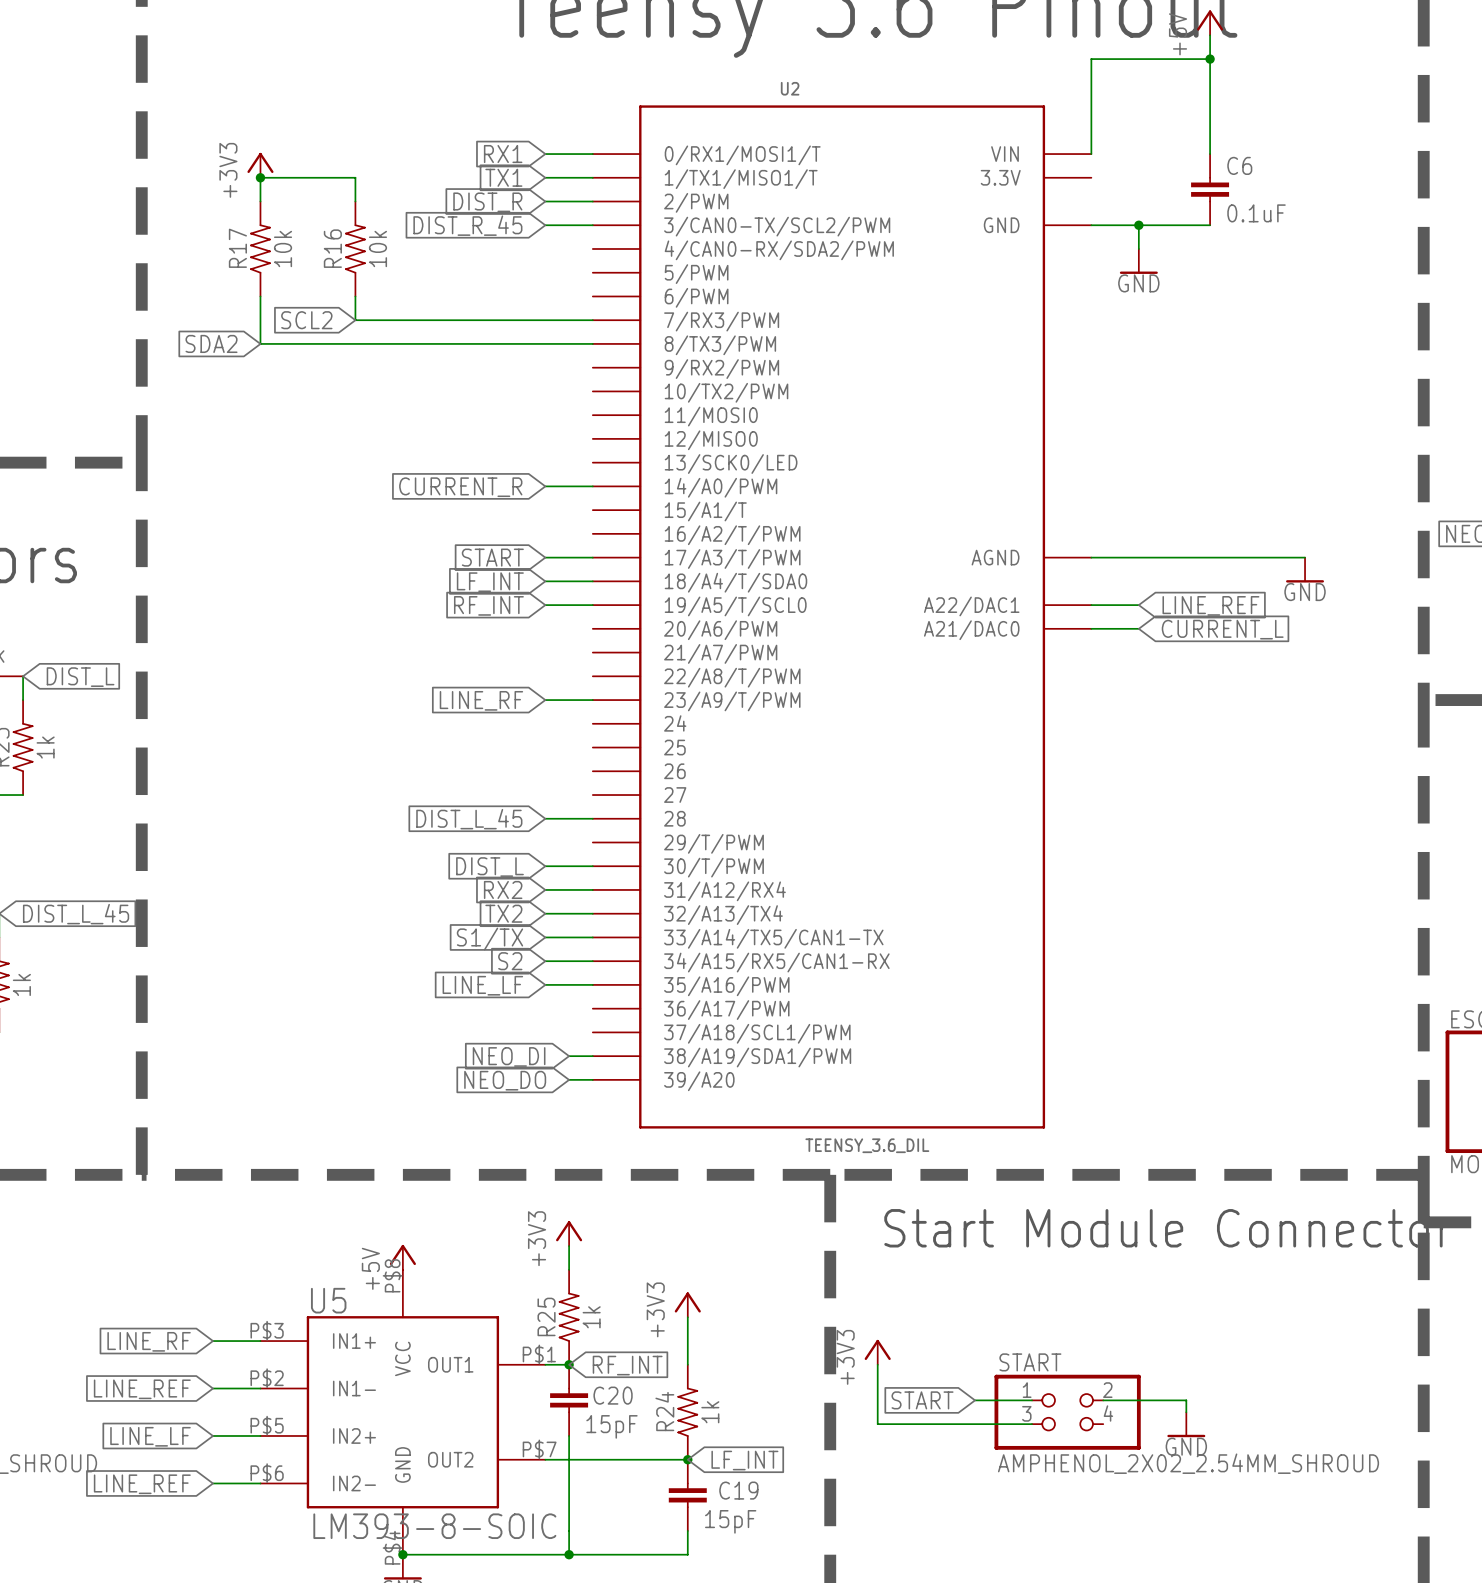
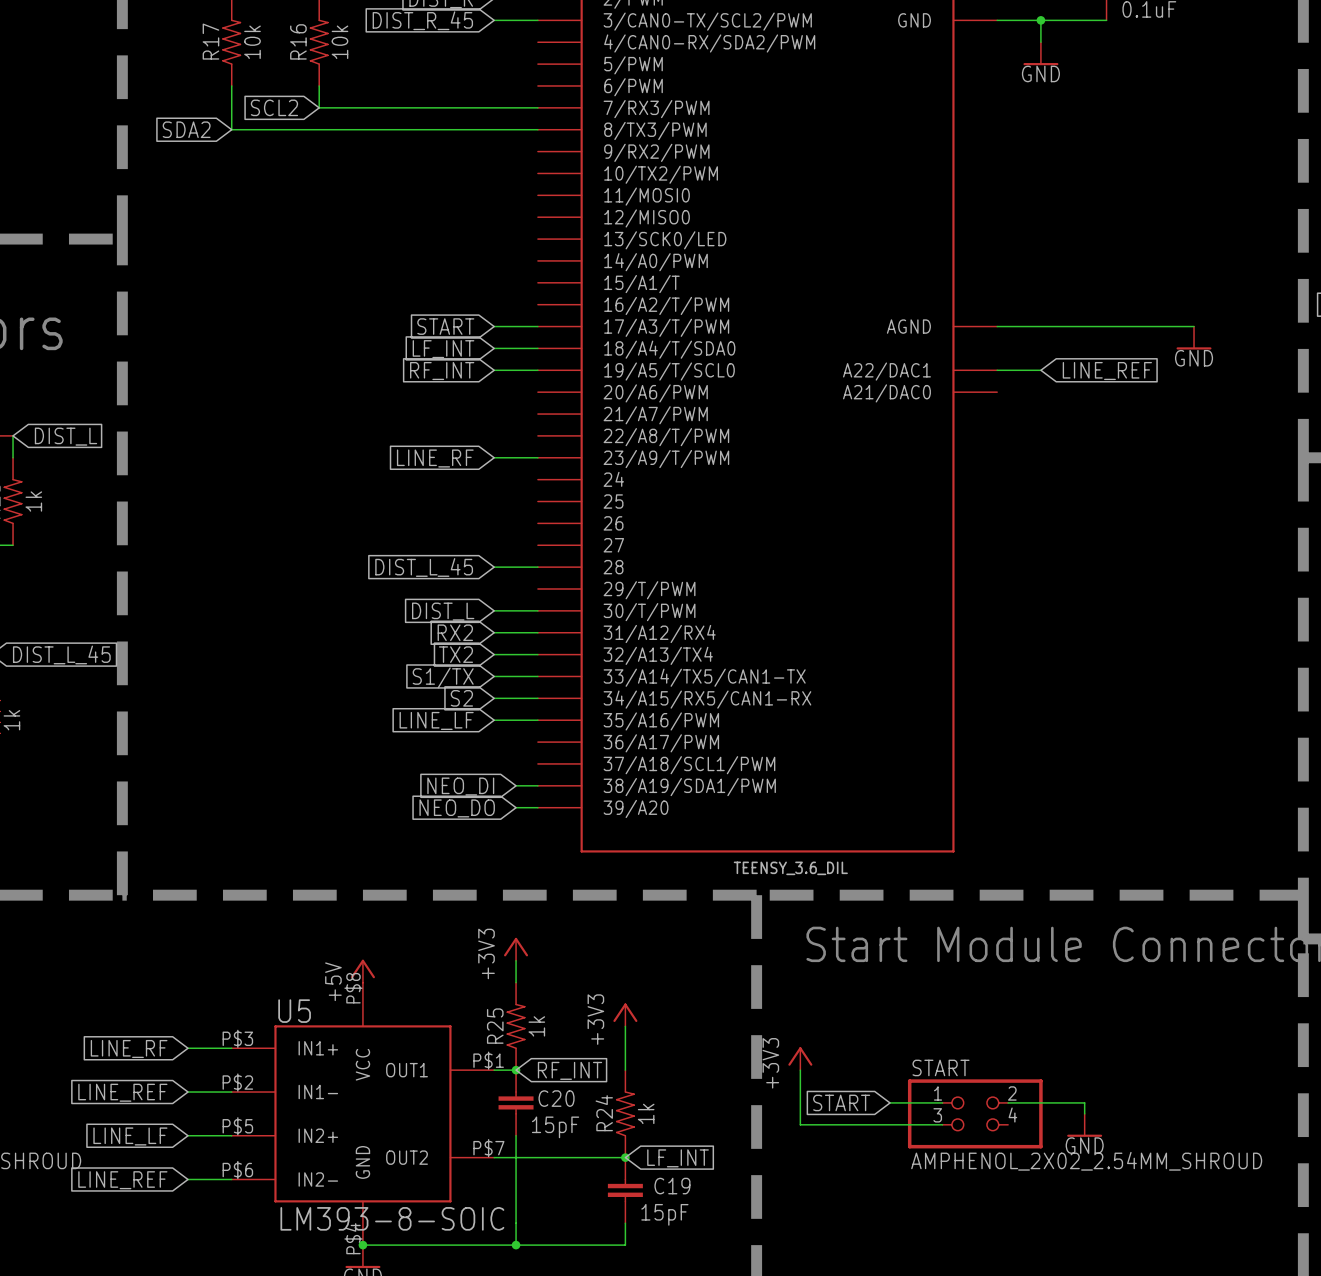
wire: (545, 486) (592, 486) -> none
global label: CURRENT_R (460, 487) -> none
wire: (1091, 628) (1138, 628) -> none
global label: CURRENT_L (1222, 629) -> none

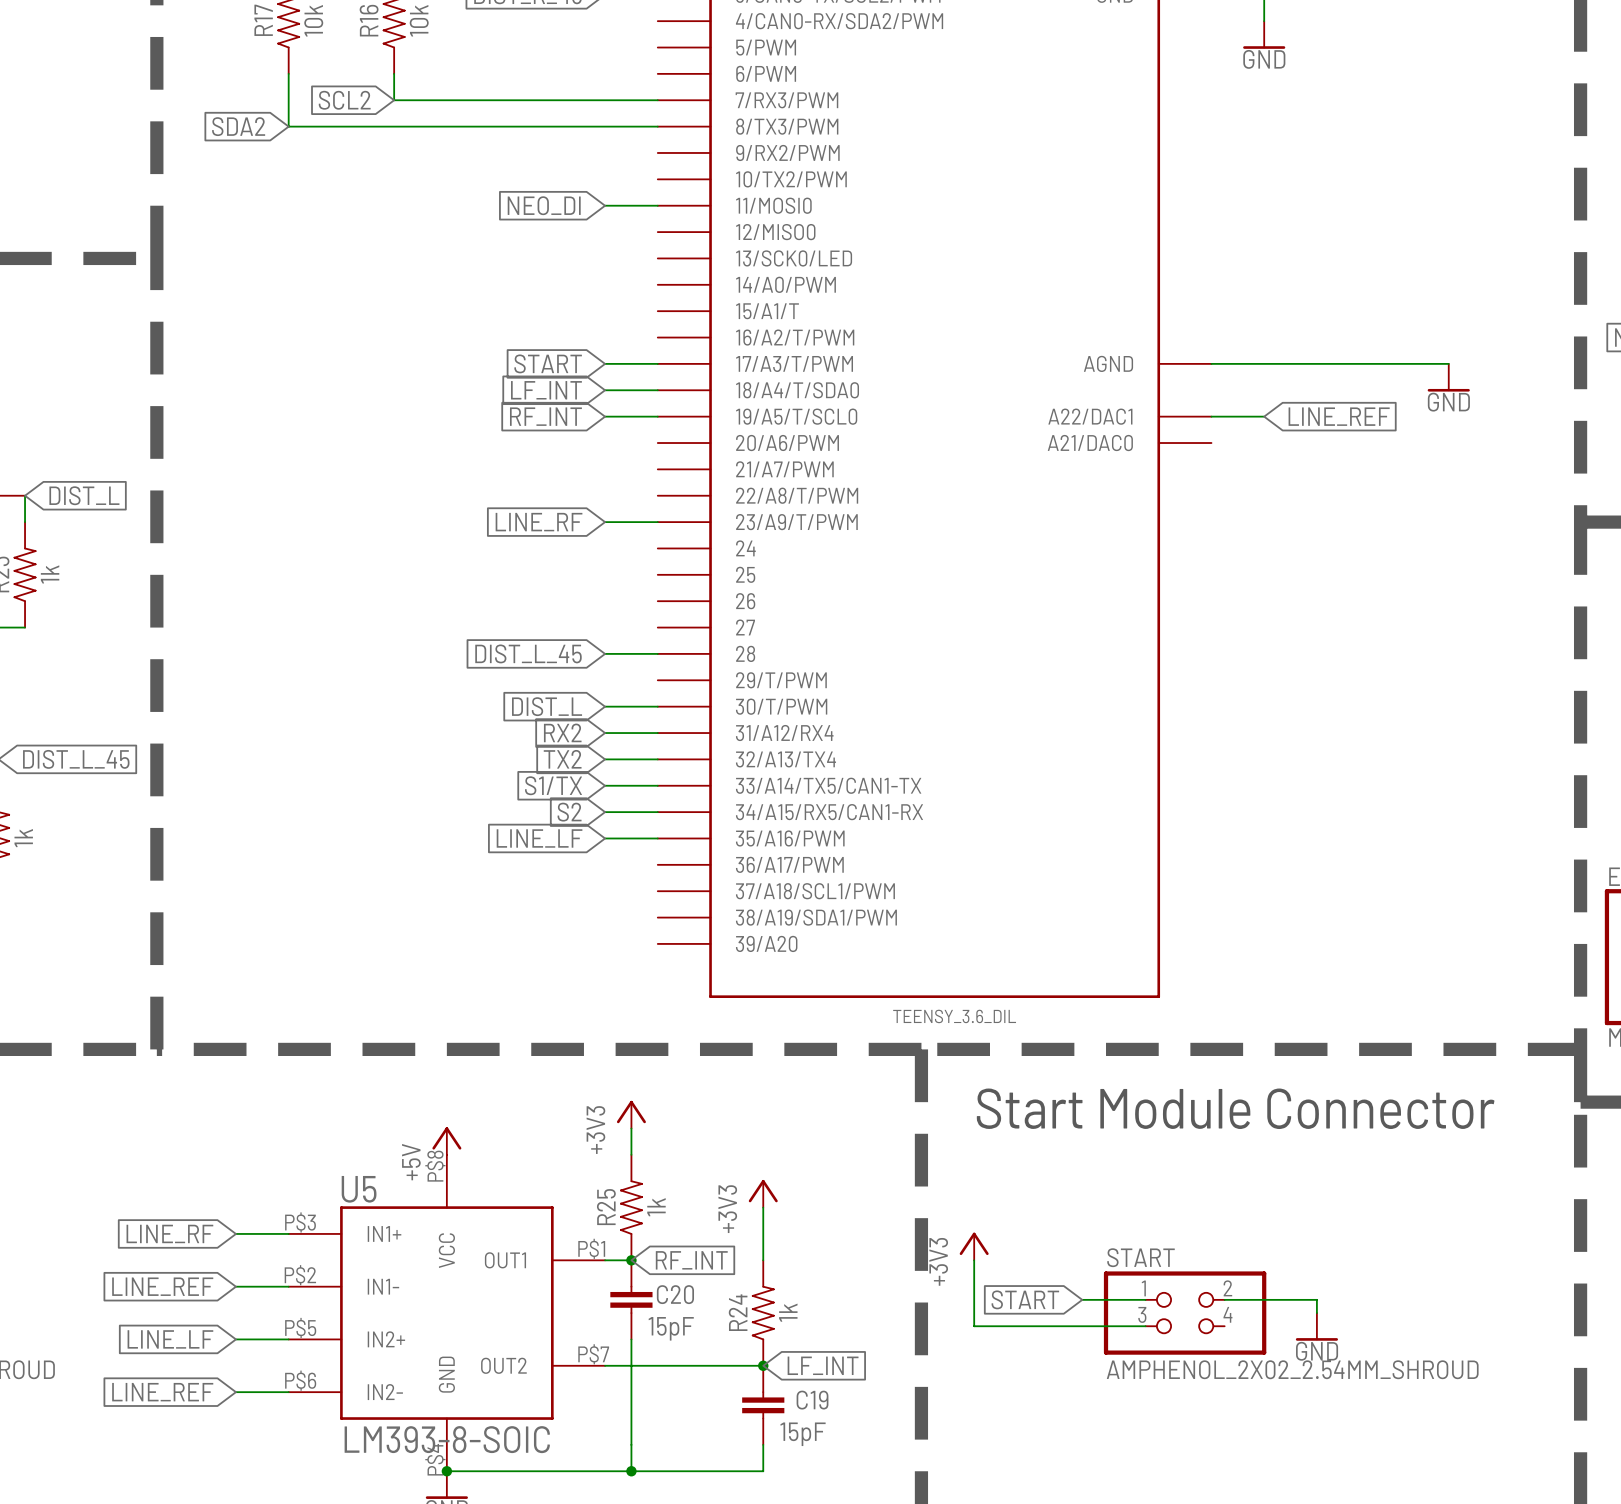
wire: none -> (605, 205) (657, 205)
global label: none -> NEO_DI (544, 205)
wire: (516, 785) (537, 785) -> none
global label: NEO_DI (460, 786) -> none
wire: (516, 807) (537, 807) -> none
global label: NEO_DO (457, 808) -> none

